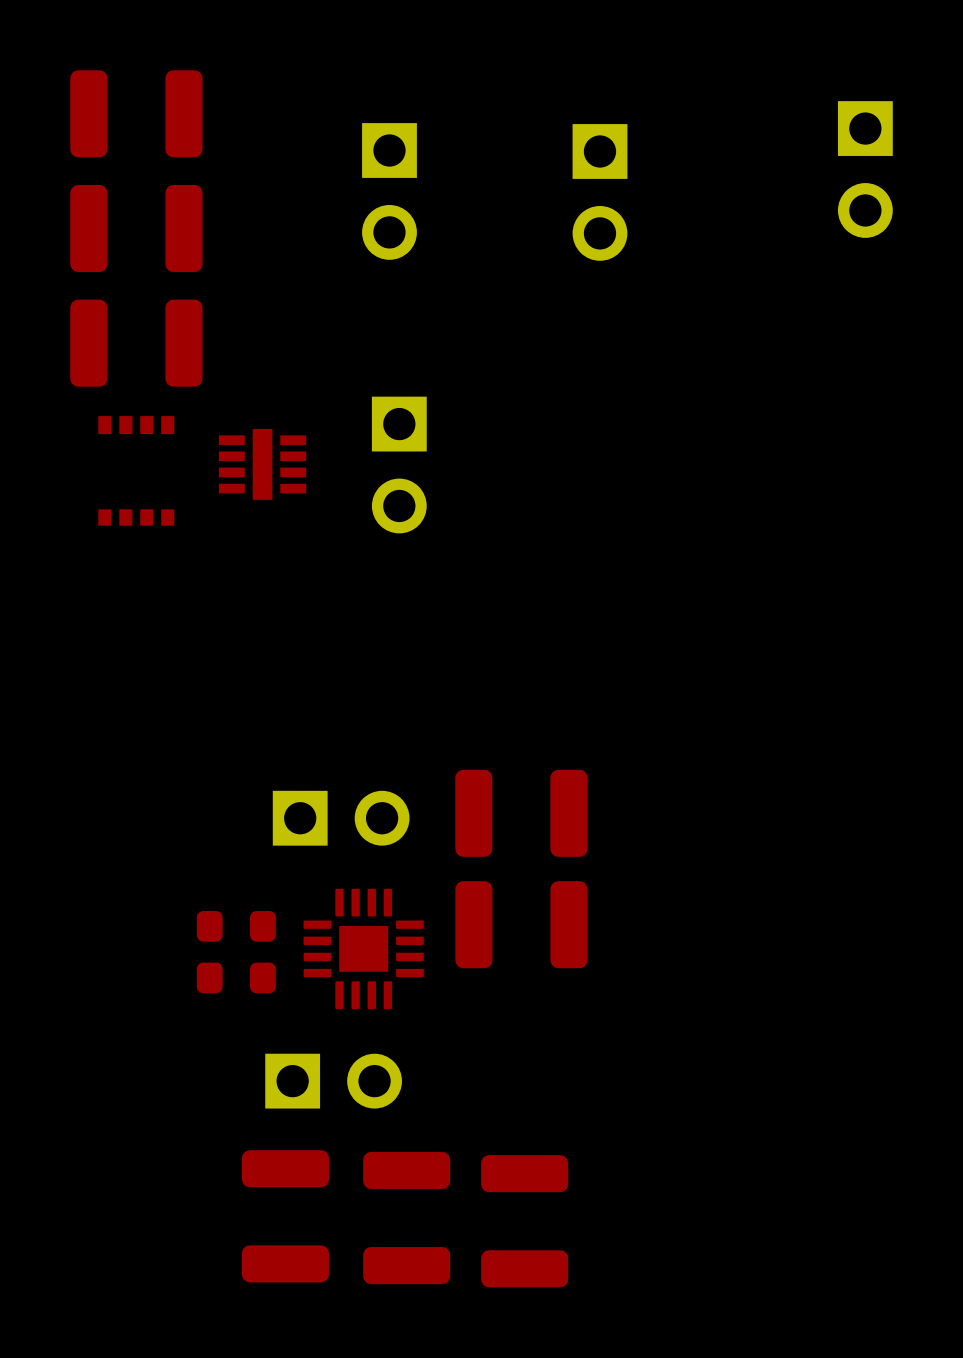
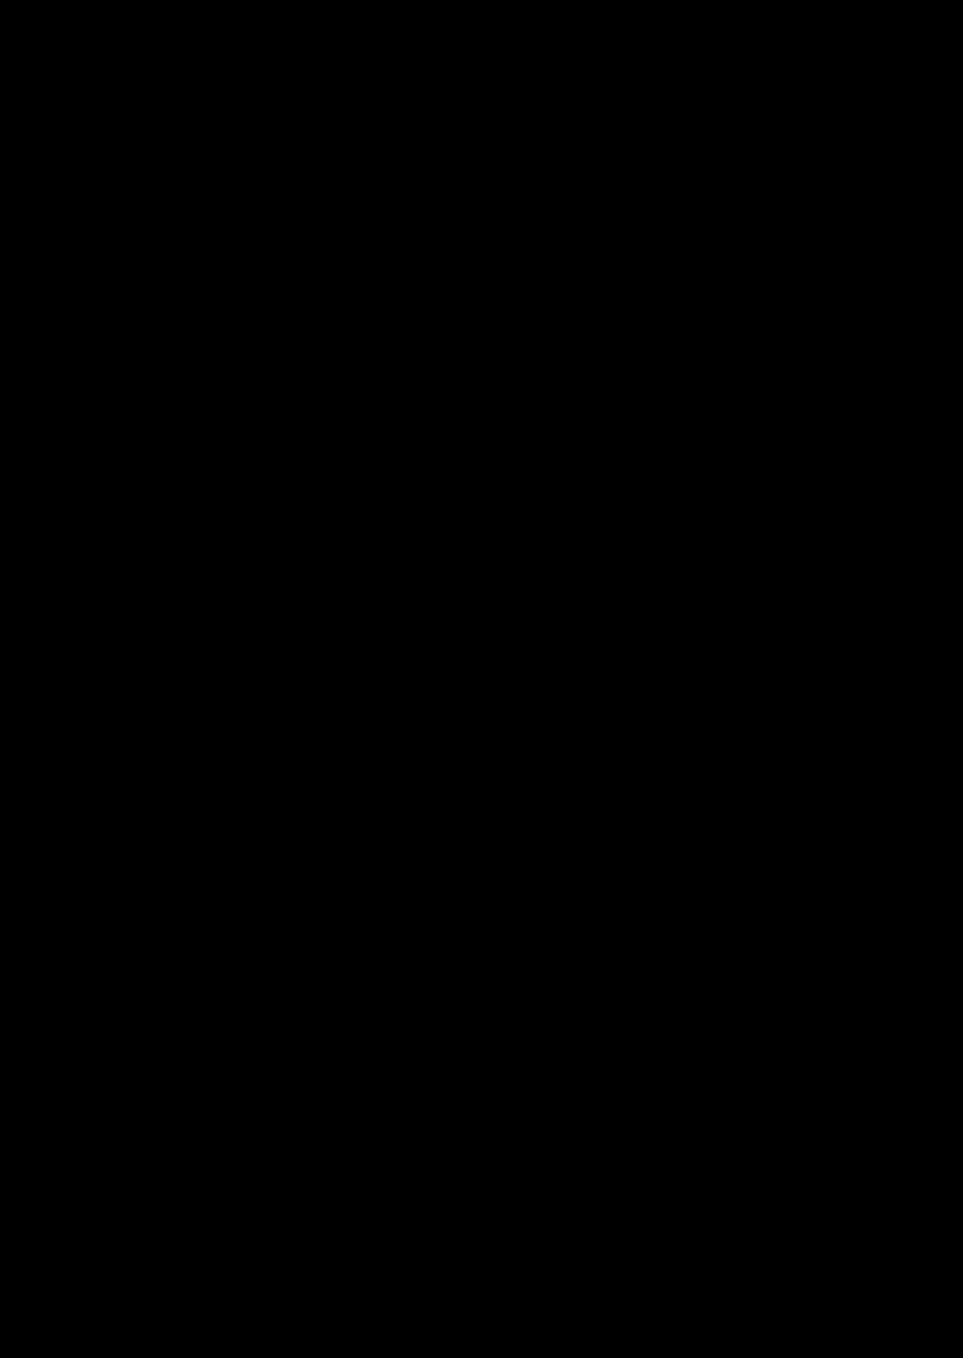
part: (136, 113) -> none
part: (865, 169) -> none
part: (389, 191) -> none
part: (599, 192) -> none
part: (136, 228) -> none
part: (136, 343) -> none
part: (262, 464) -> none
part: (399, 465) -> none
part: (136, 470) -> none
part: (521, 813) -> none
part: (341, 818) -> none
part: (521, 924) -> none
part: (236, 926) -> none
part: (363, 948) -> none
part: (236, 977) -> none
part: (333, 1081) -> none
part: (285, 1216) -> none
part: (406, 1218) -> none
part: (524, 1221) -> none

